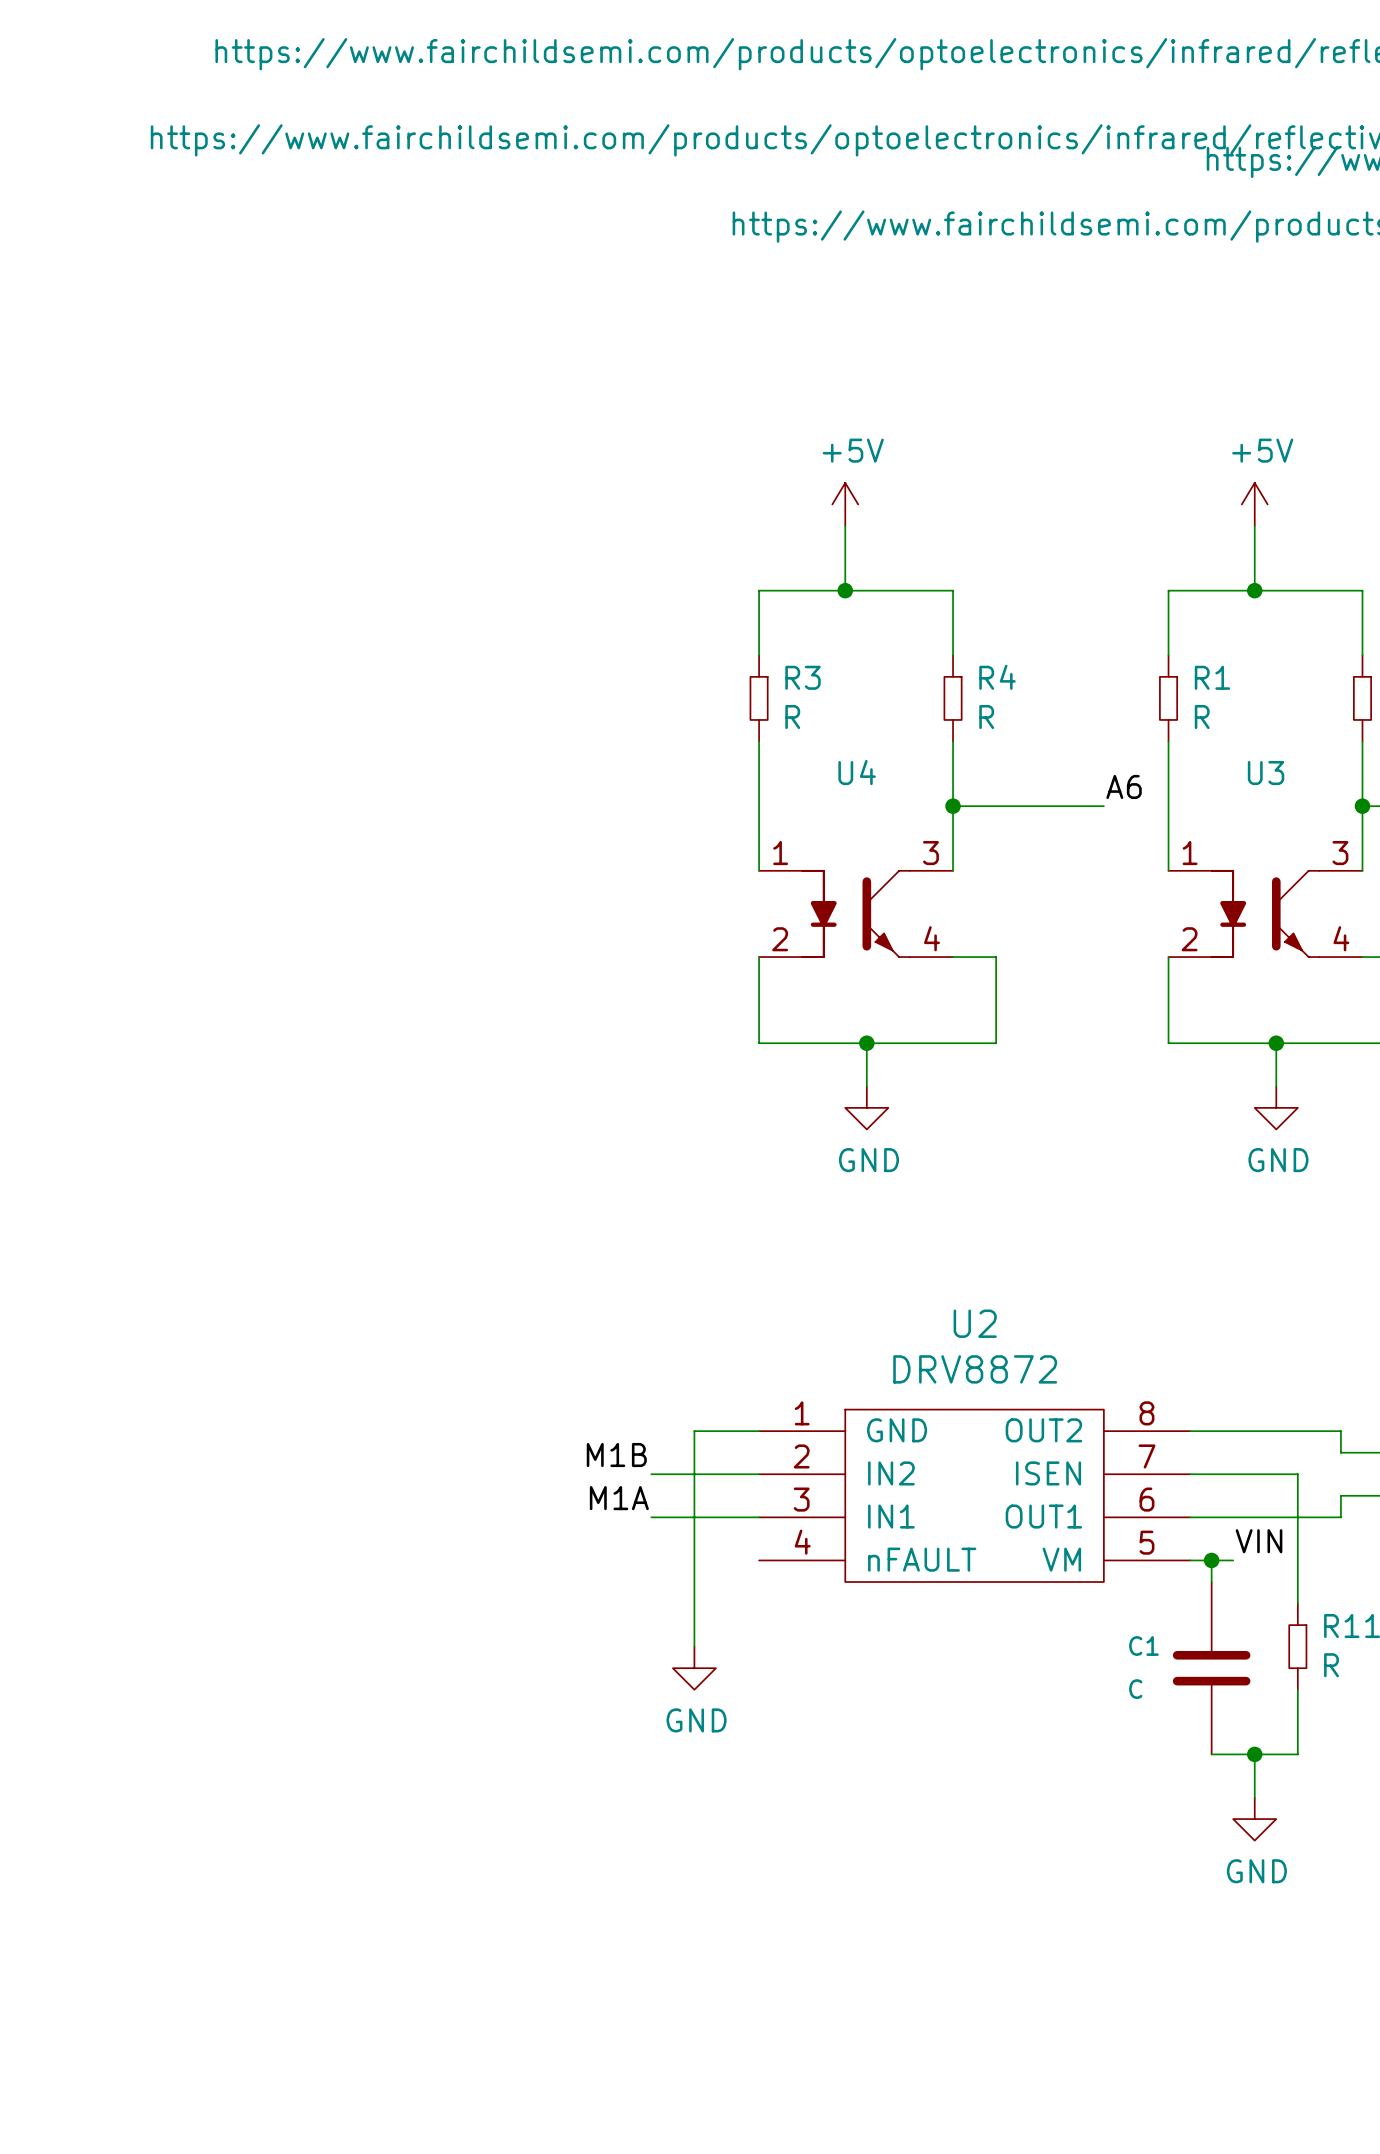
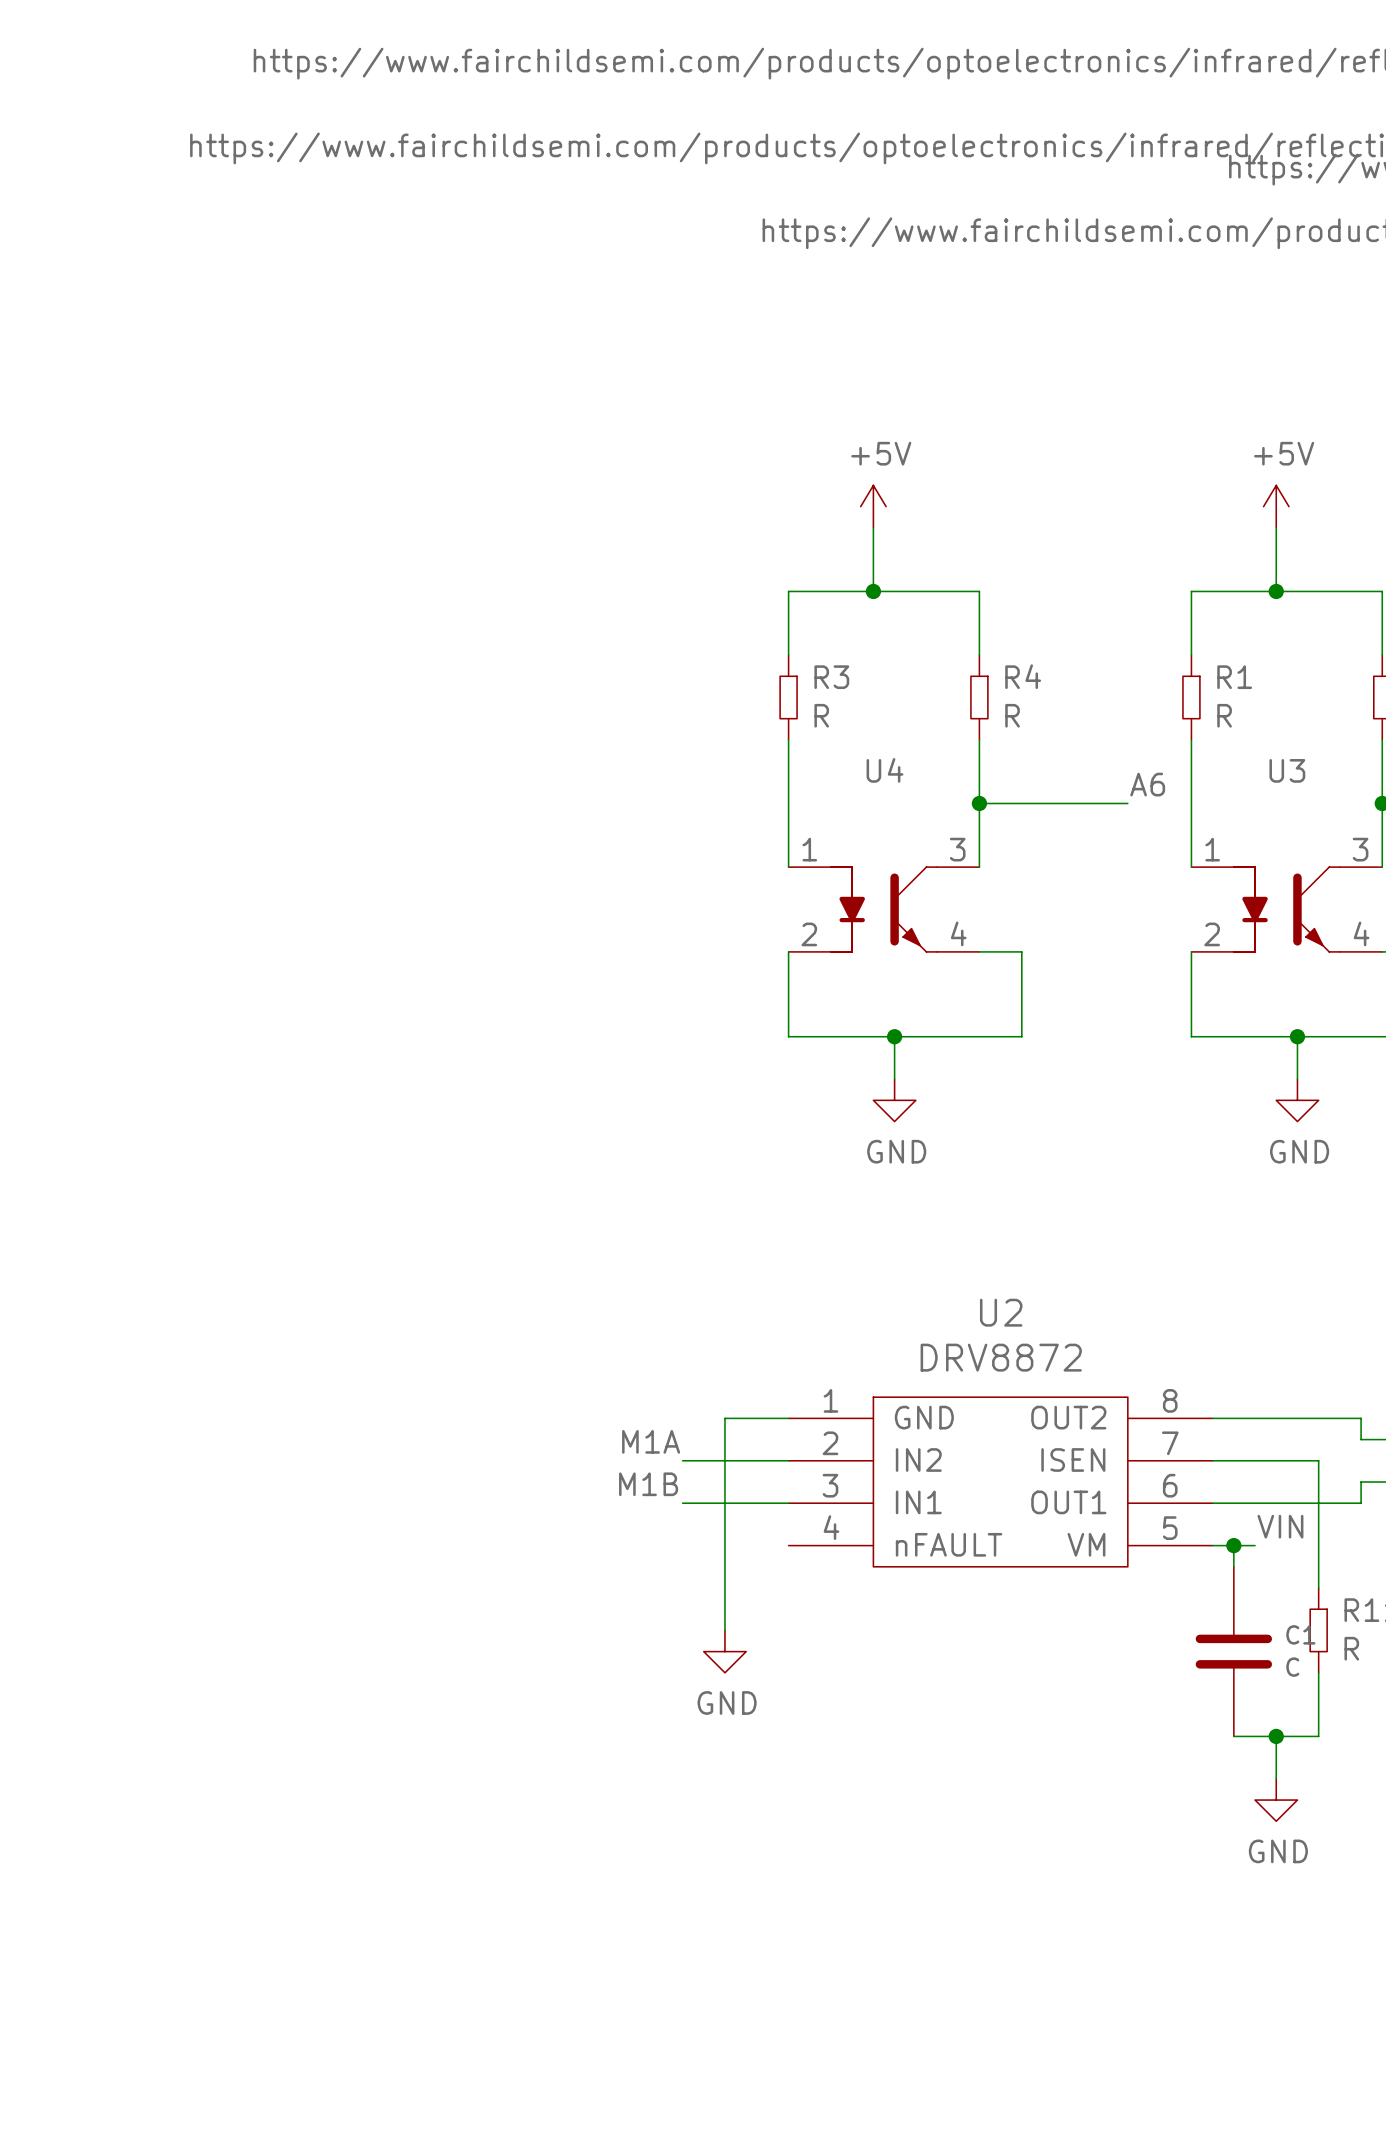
label: M1B (616, 1455) -> M1A (651, 1441)
label: M1A (619, 1498) -> M1B (648, 1484)
C1 name position: C1 (1143, 1646) -> C1 (1300, 1634)
C1 value position: C (1135, 1689) -> C (1292, 1667)

